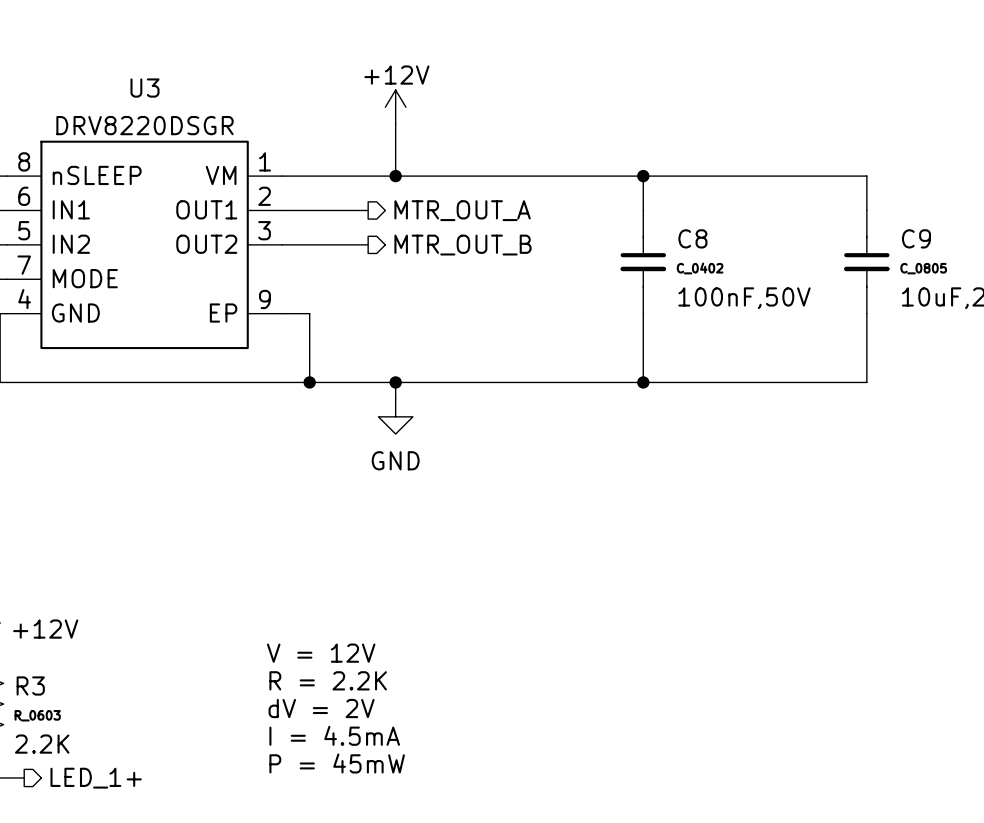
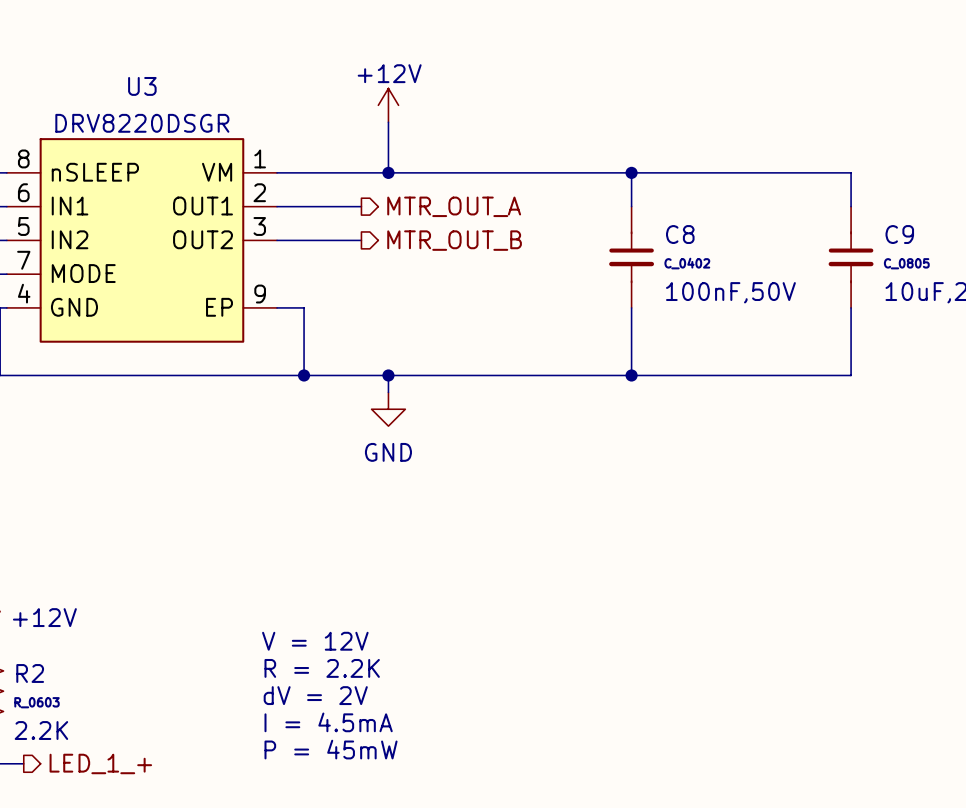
R3 name: R3 (30, 685) -> R2 (30, 673)
hierarchical label: LED_1+ (96, 778) -> LED_1_+ (100, 763)

